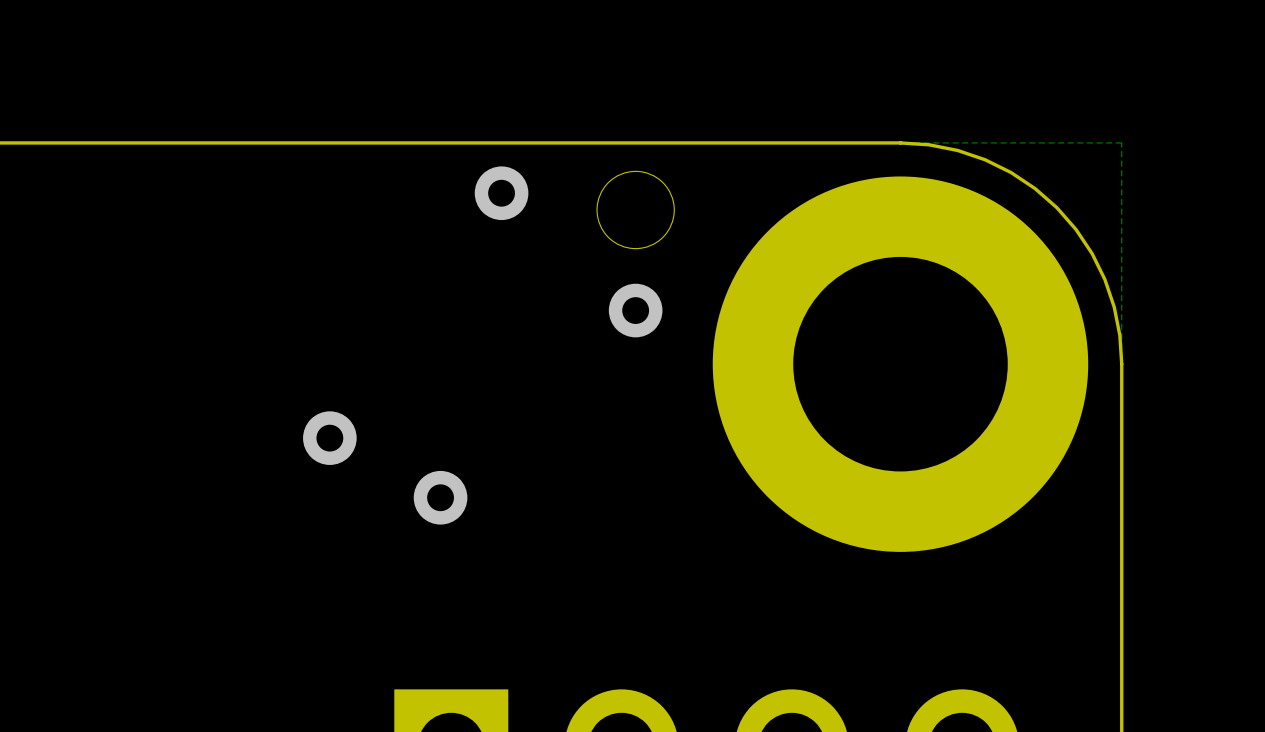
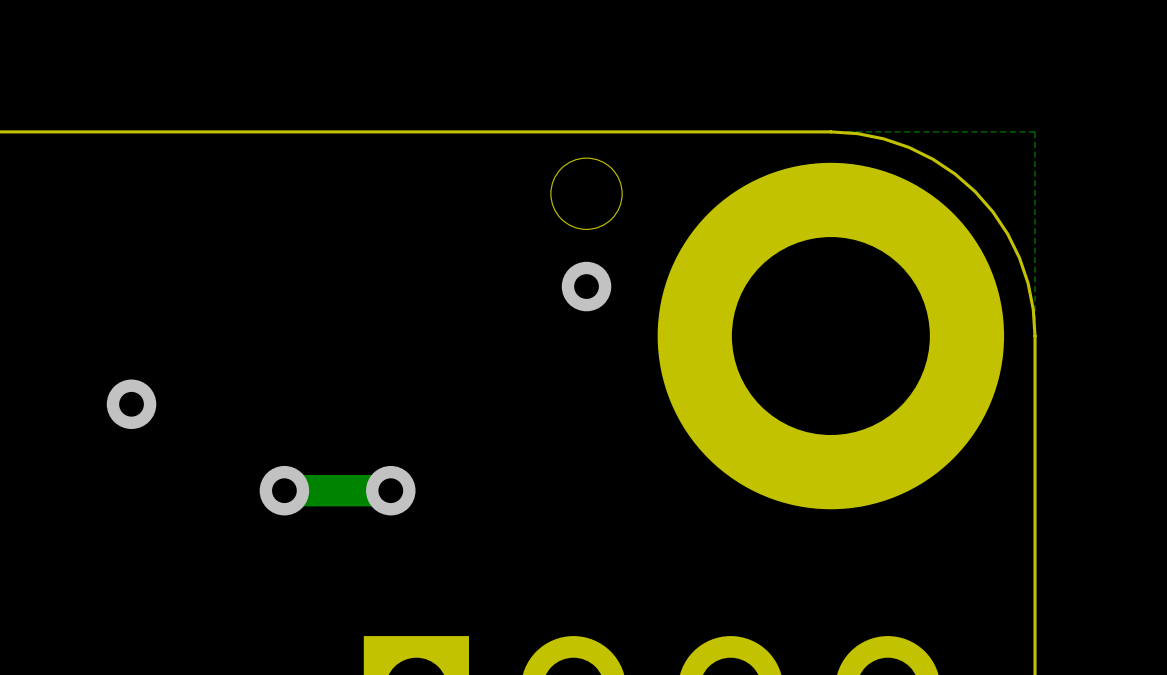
via: (501, 193) -> none
via: none -> (131, 404)
via: (329, 438) -> none
via position: (440, 497) -> (390, 490)
via: none -> (284, 490)
track: none -> (390, 490) (284, 490)

